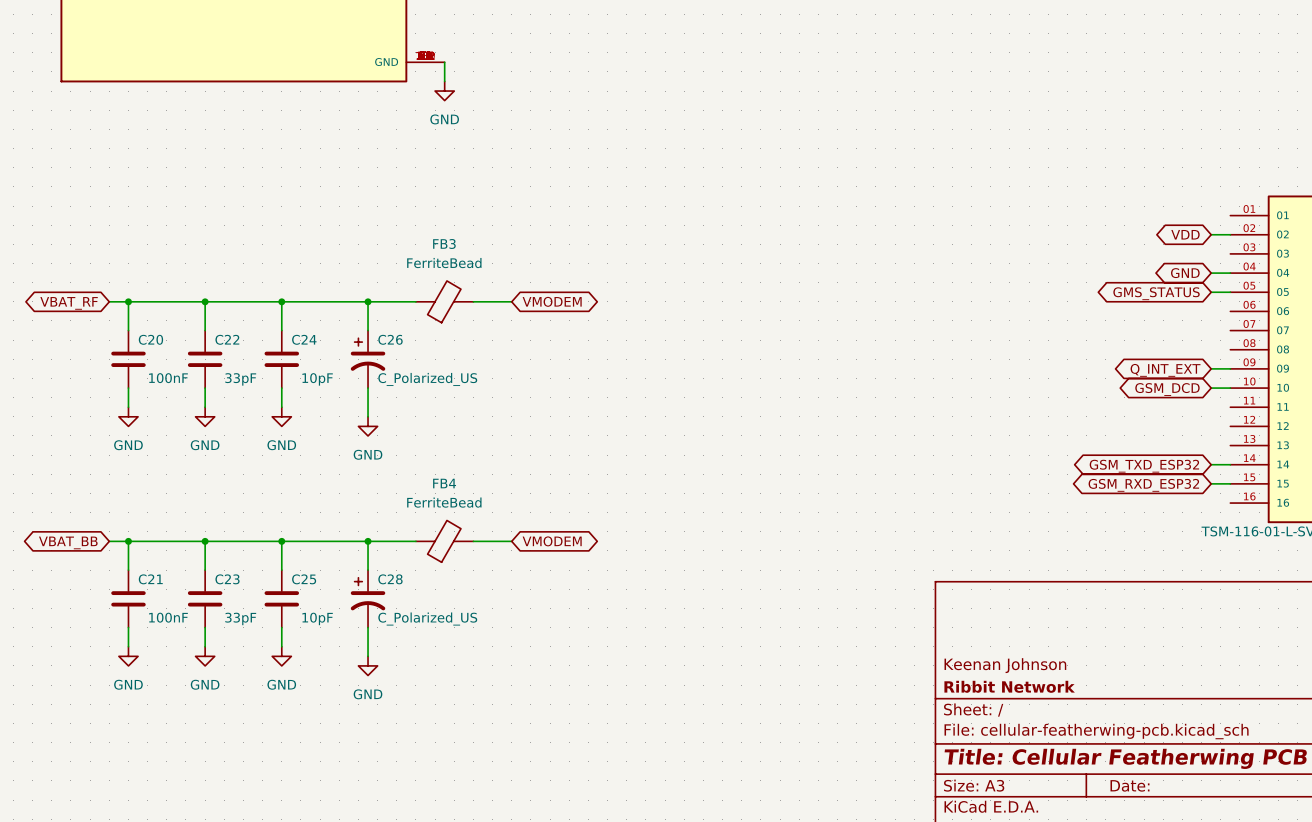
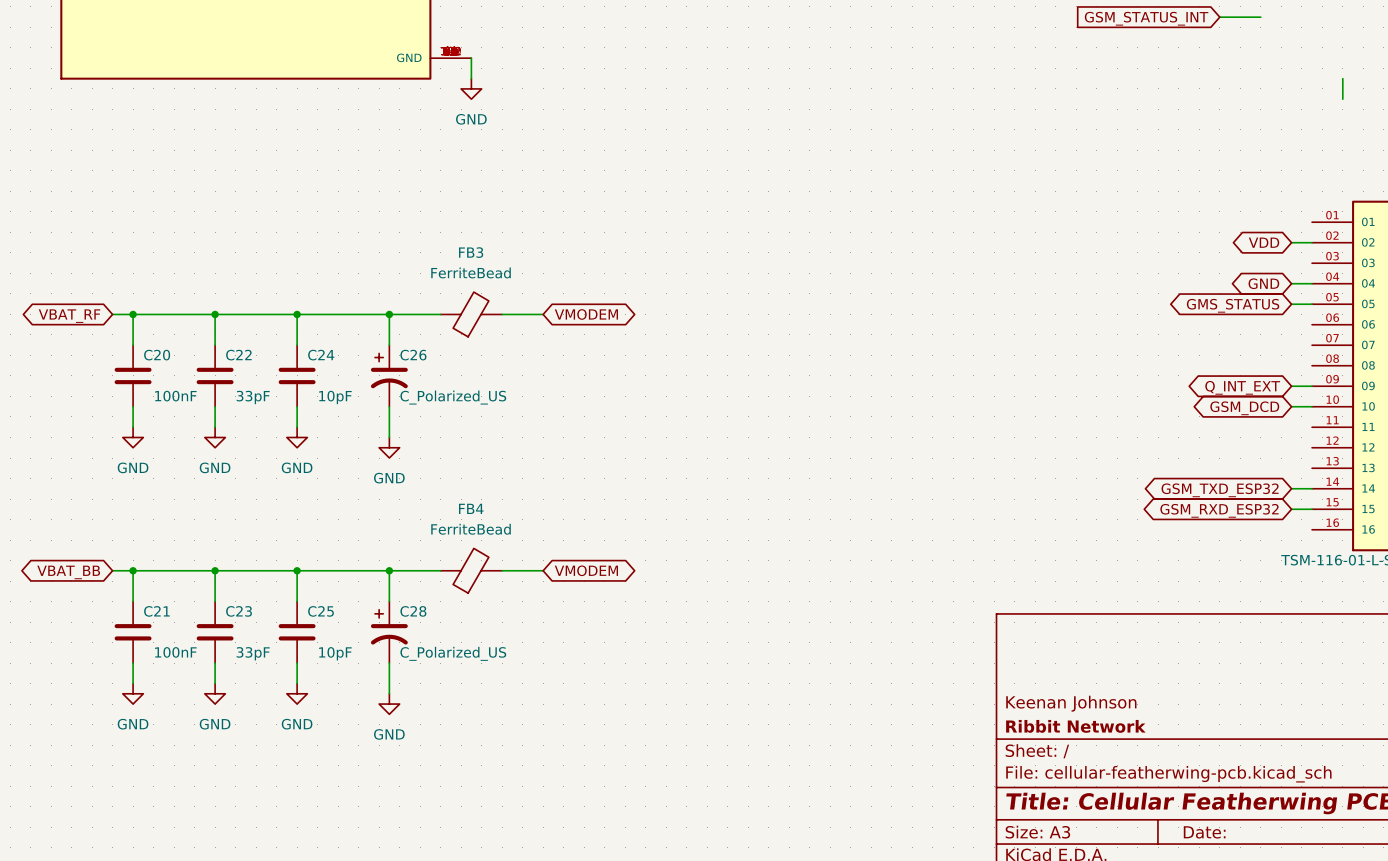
wire: none -> (1219, 17) (1260, 17)
global label: none -> GSM_STATUS_INT (1146, 18)
wire: none -> (1342, 78) (1342, 99)

